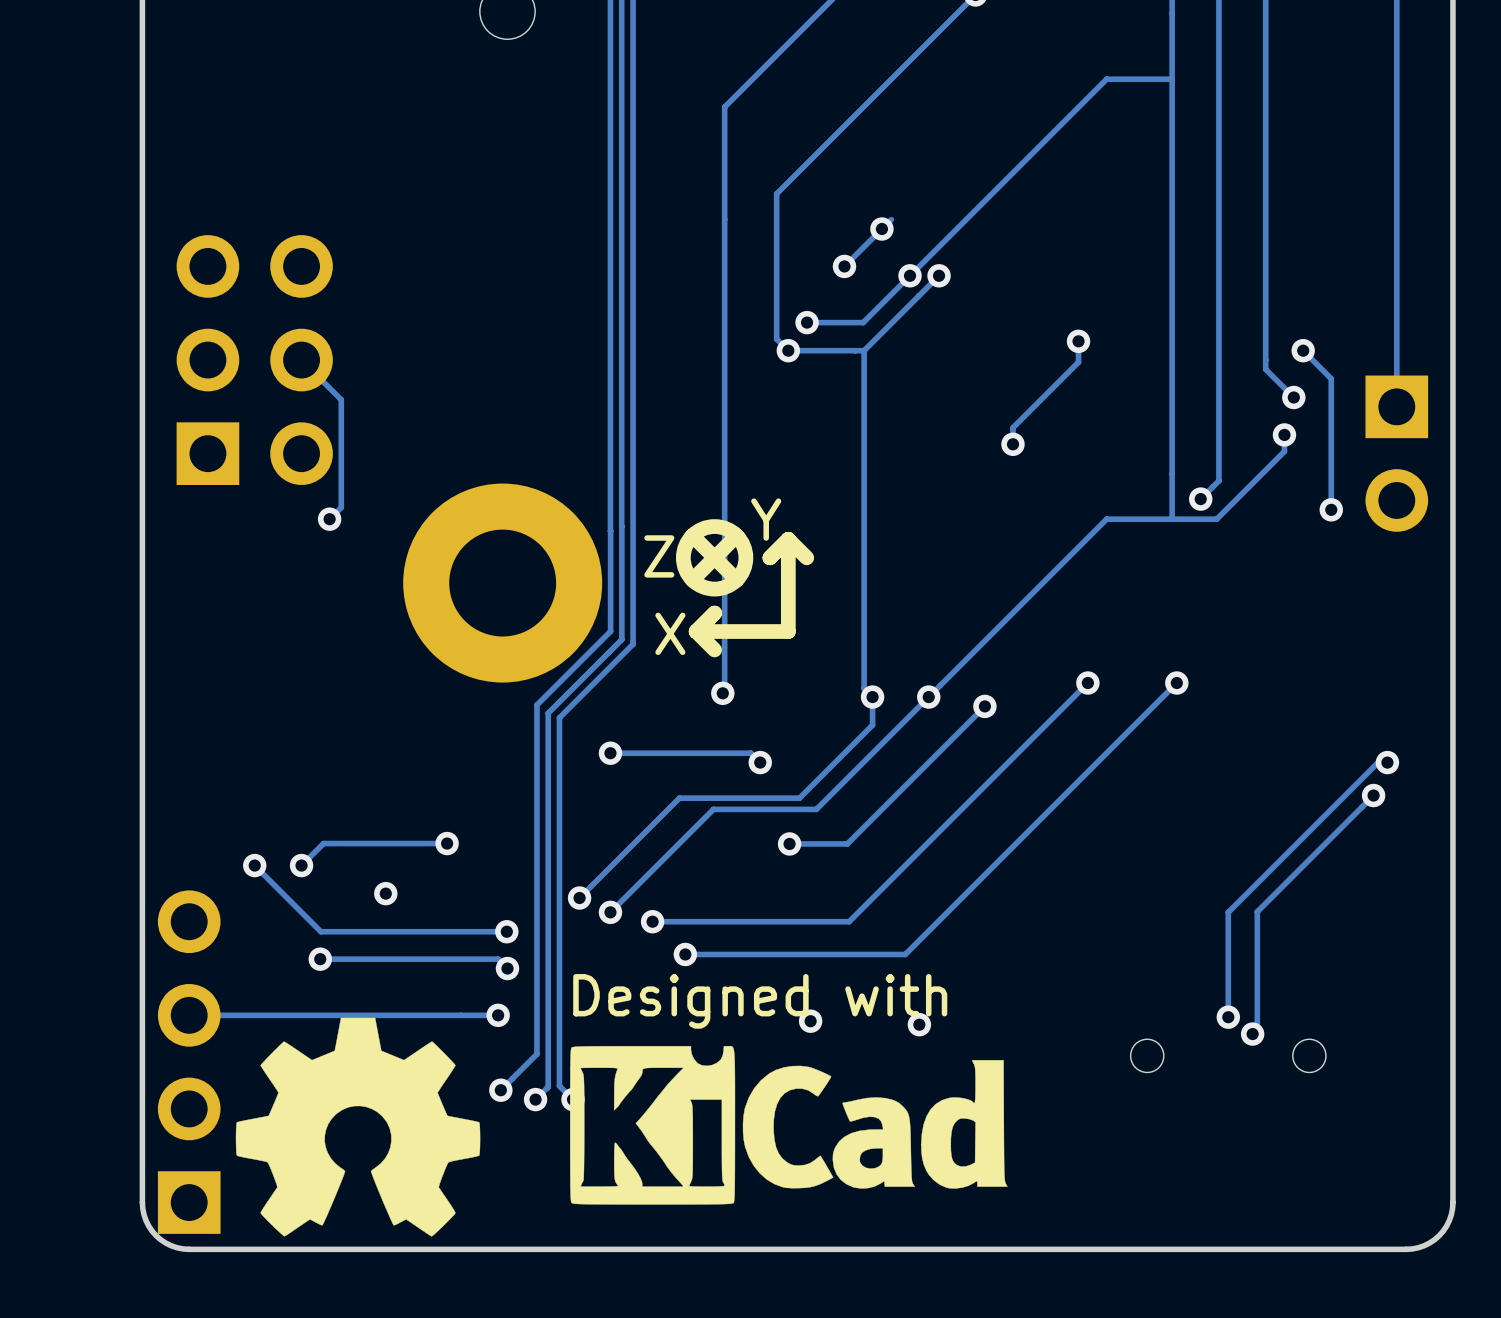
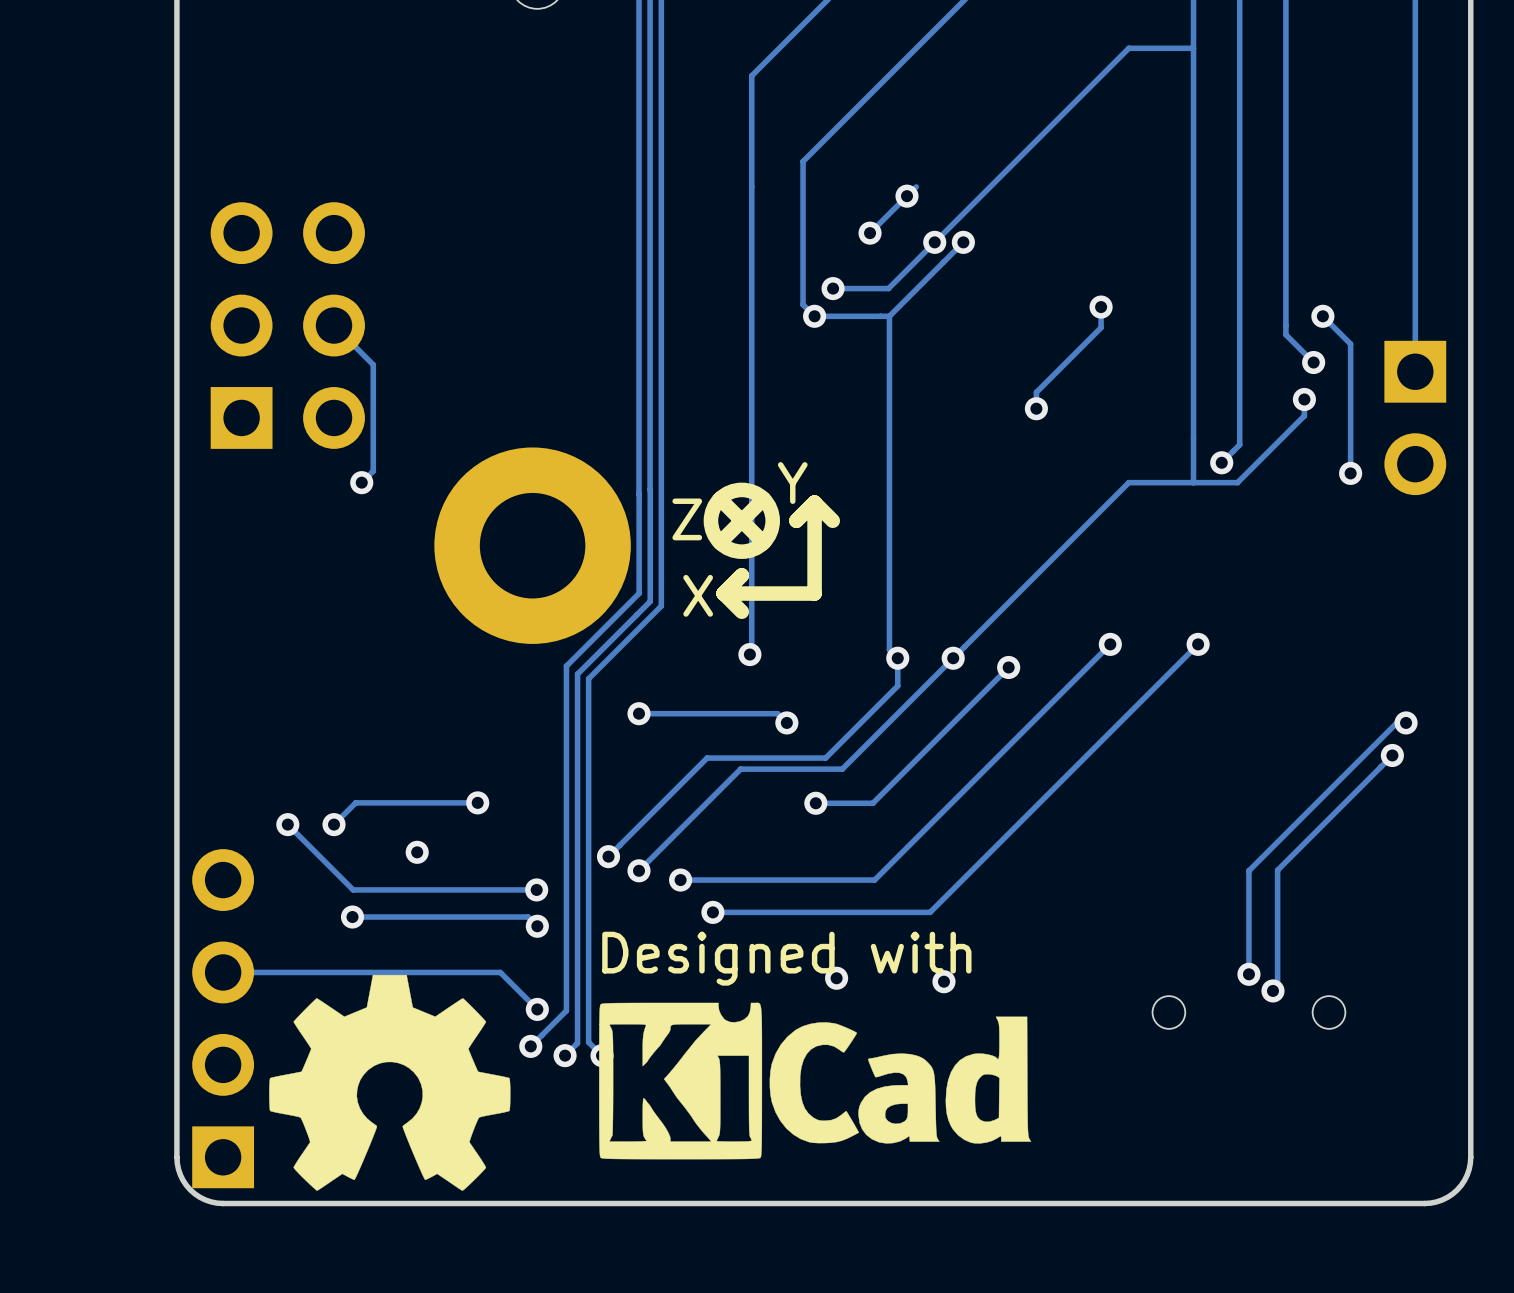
track: (498, 1015) (470, 1015) -> (537, 1009) (500, 972)
via position: (498, 1015) -> (537, 1009)

